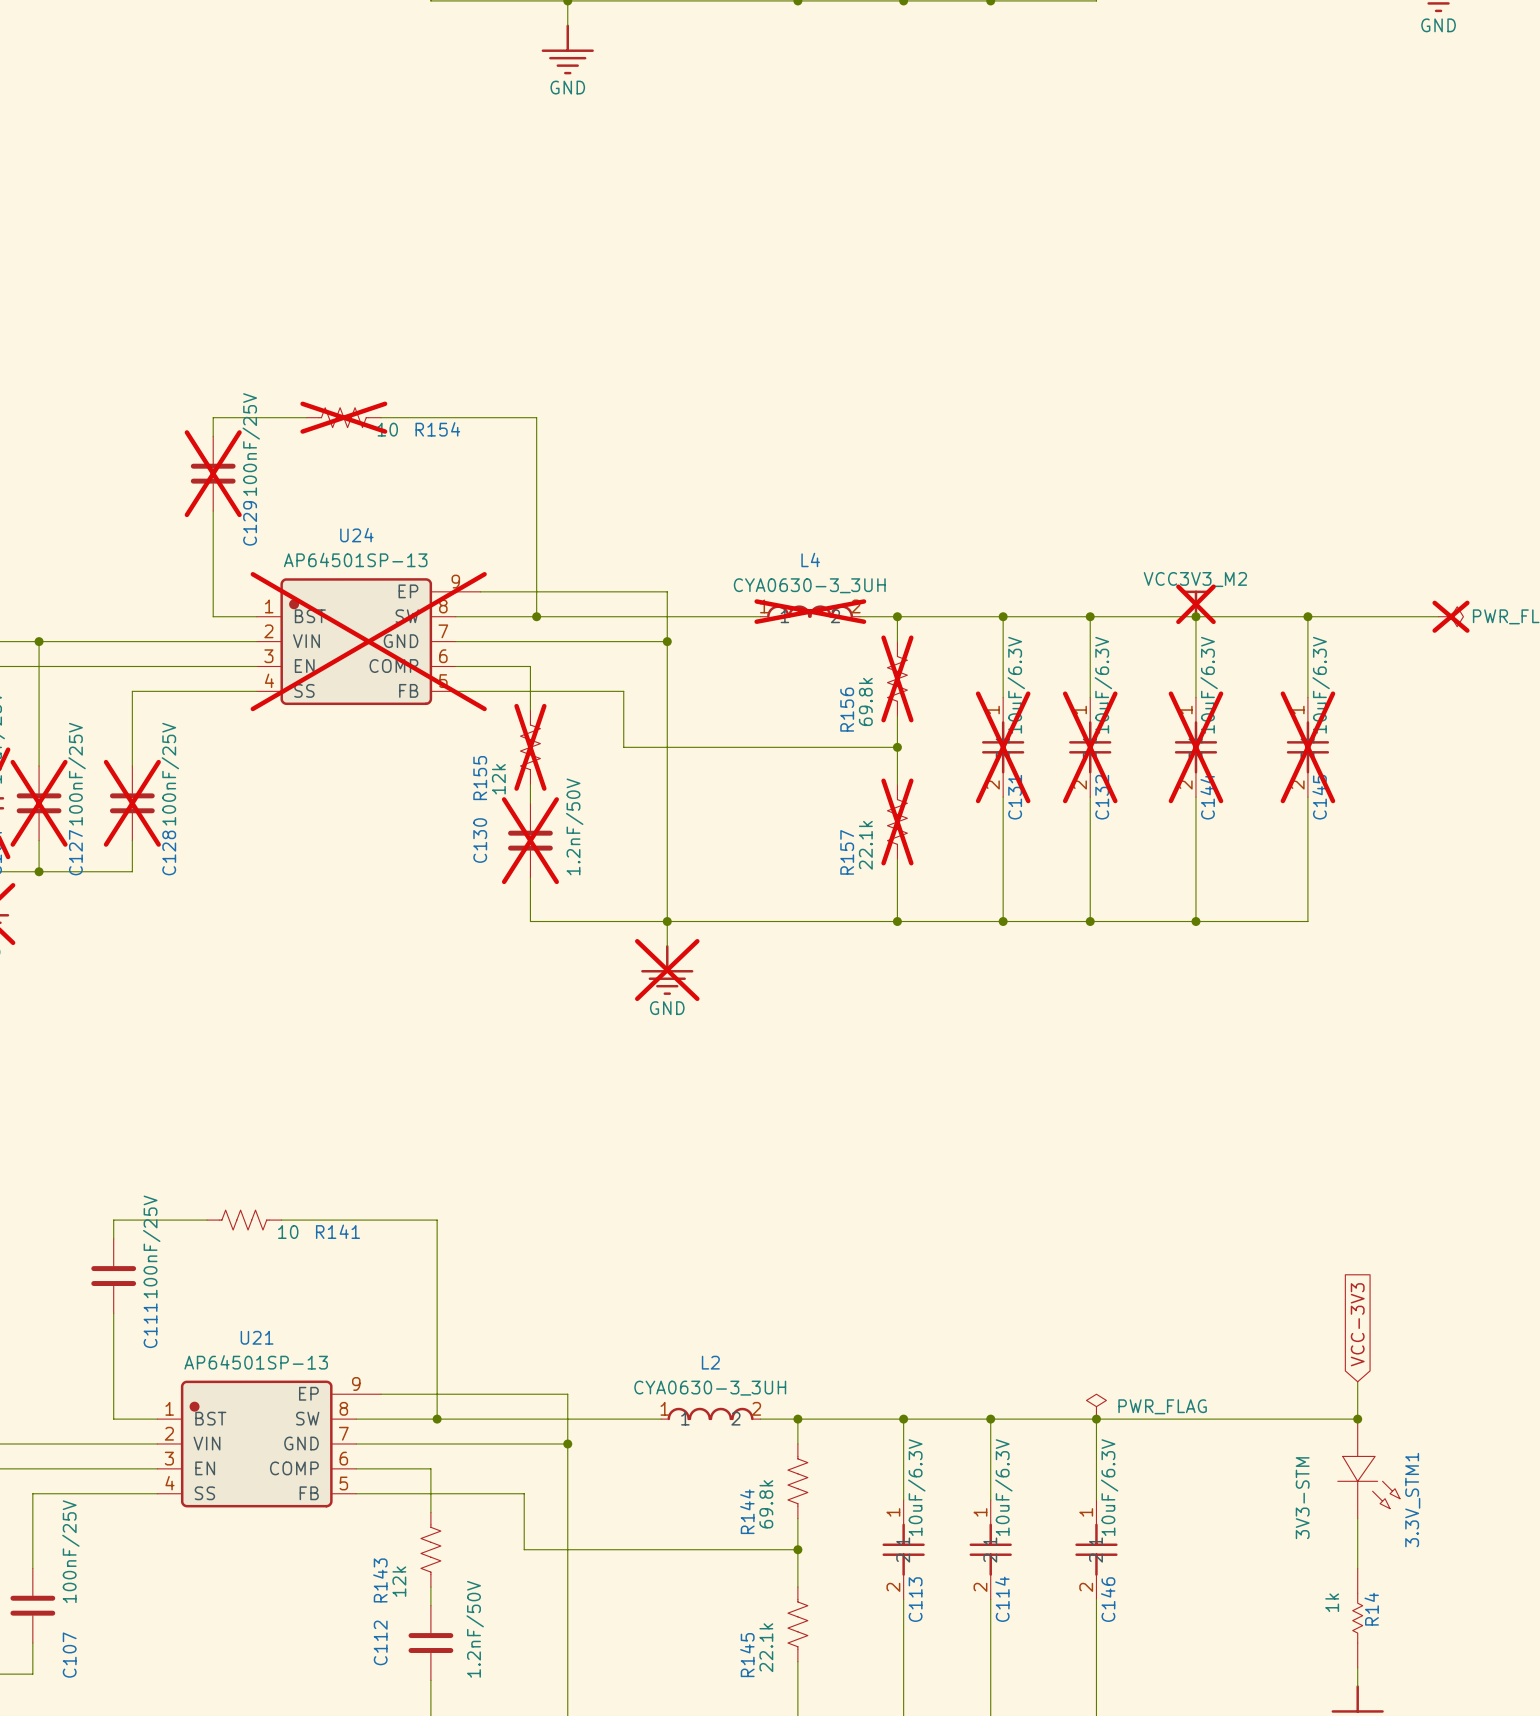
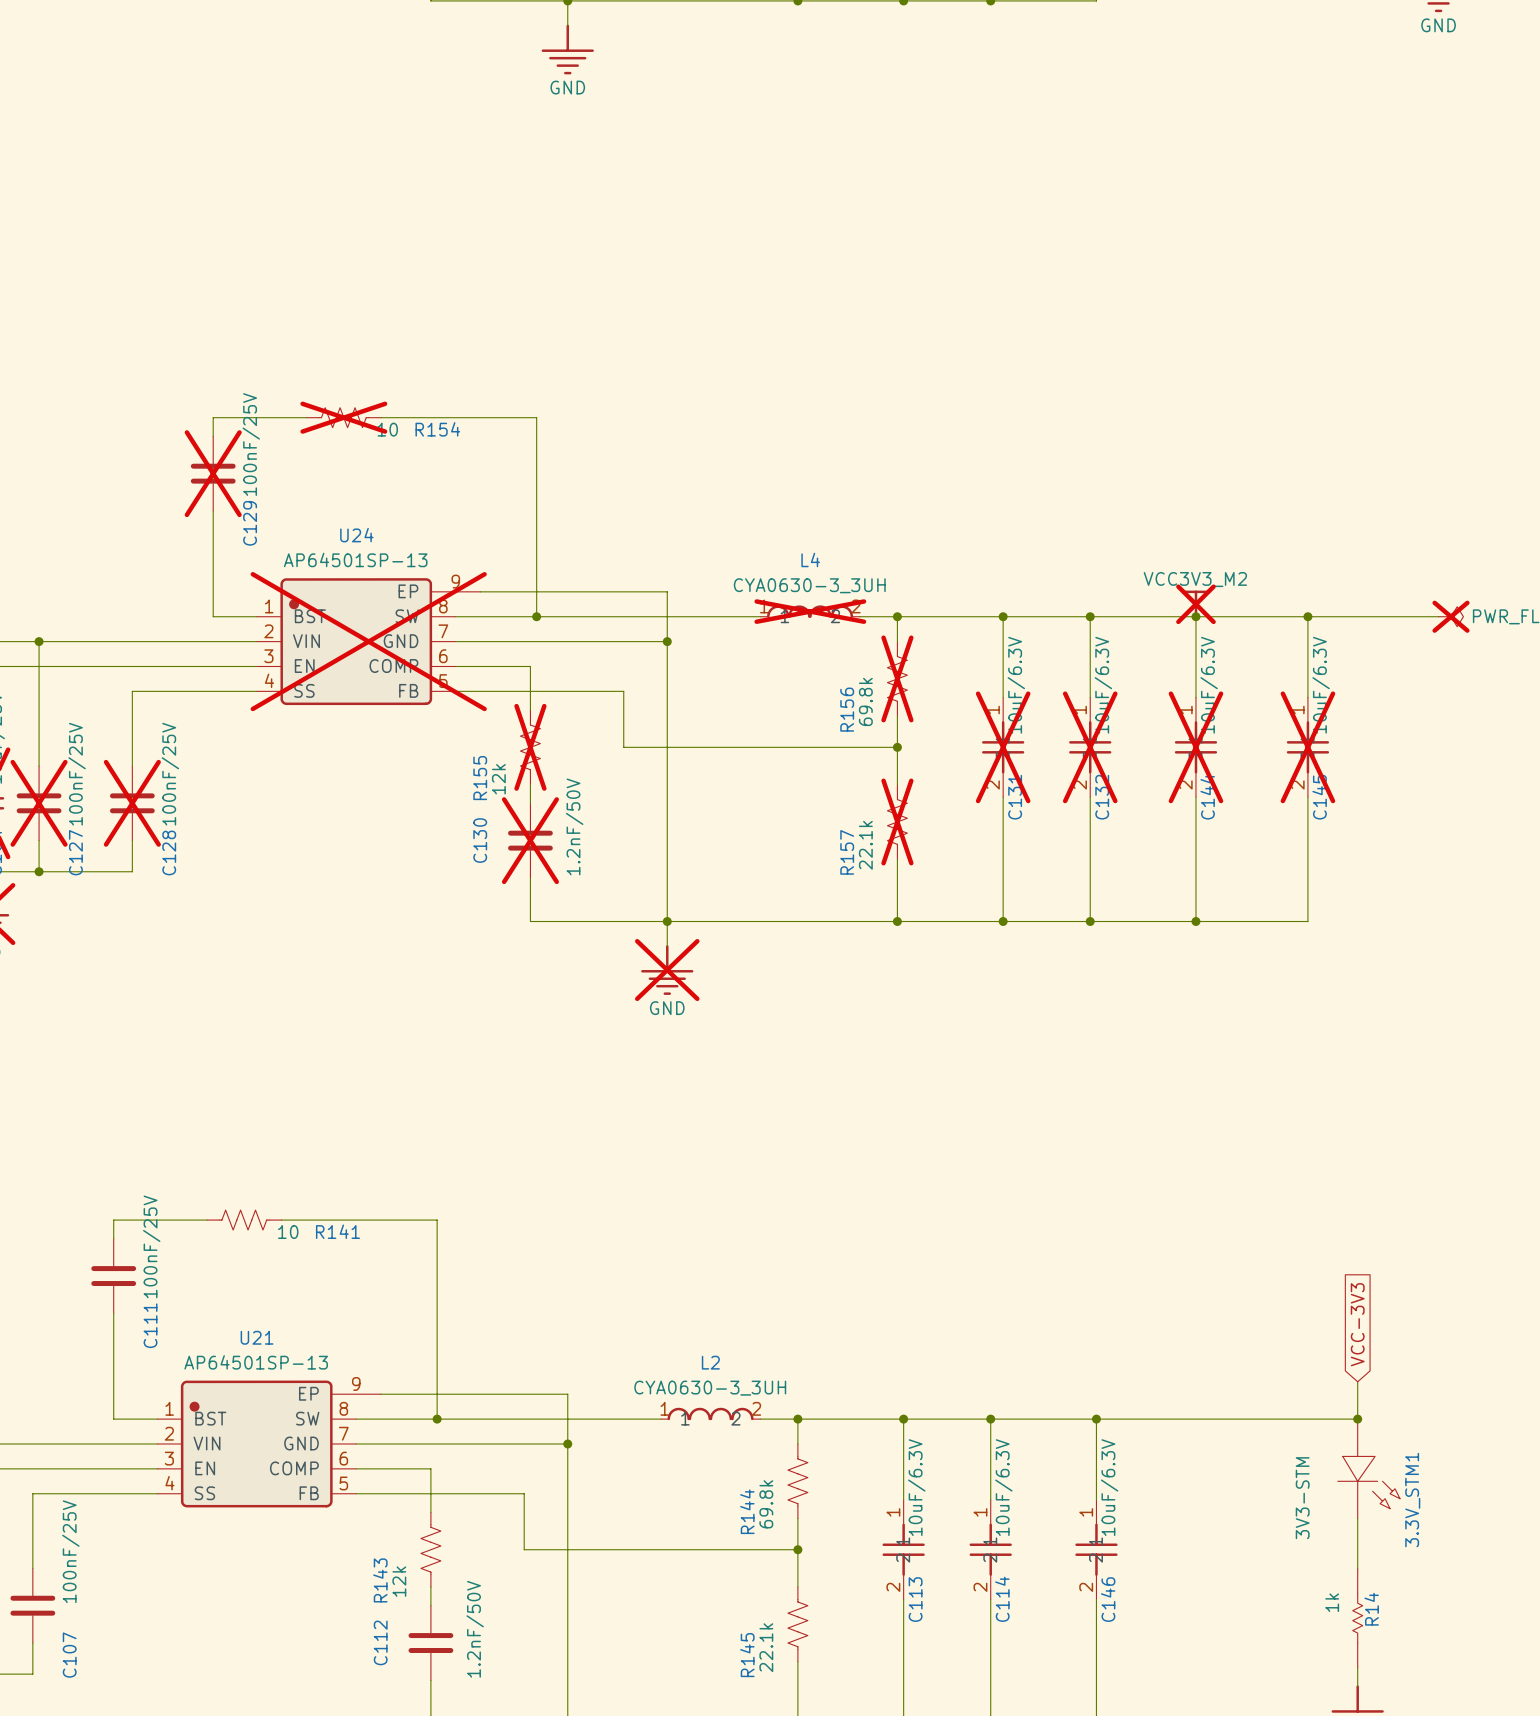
power symbol: PWR_FLAG (1096, 1406) -> none

